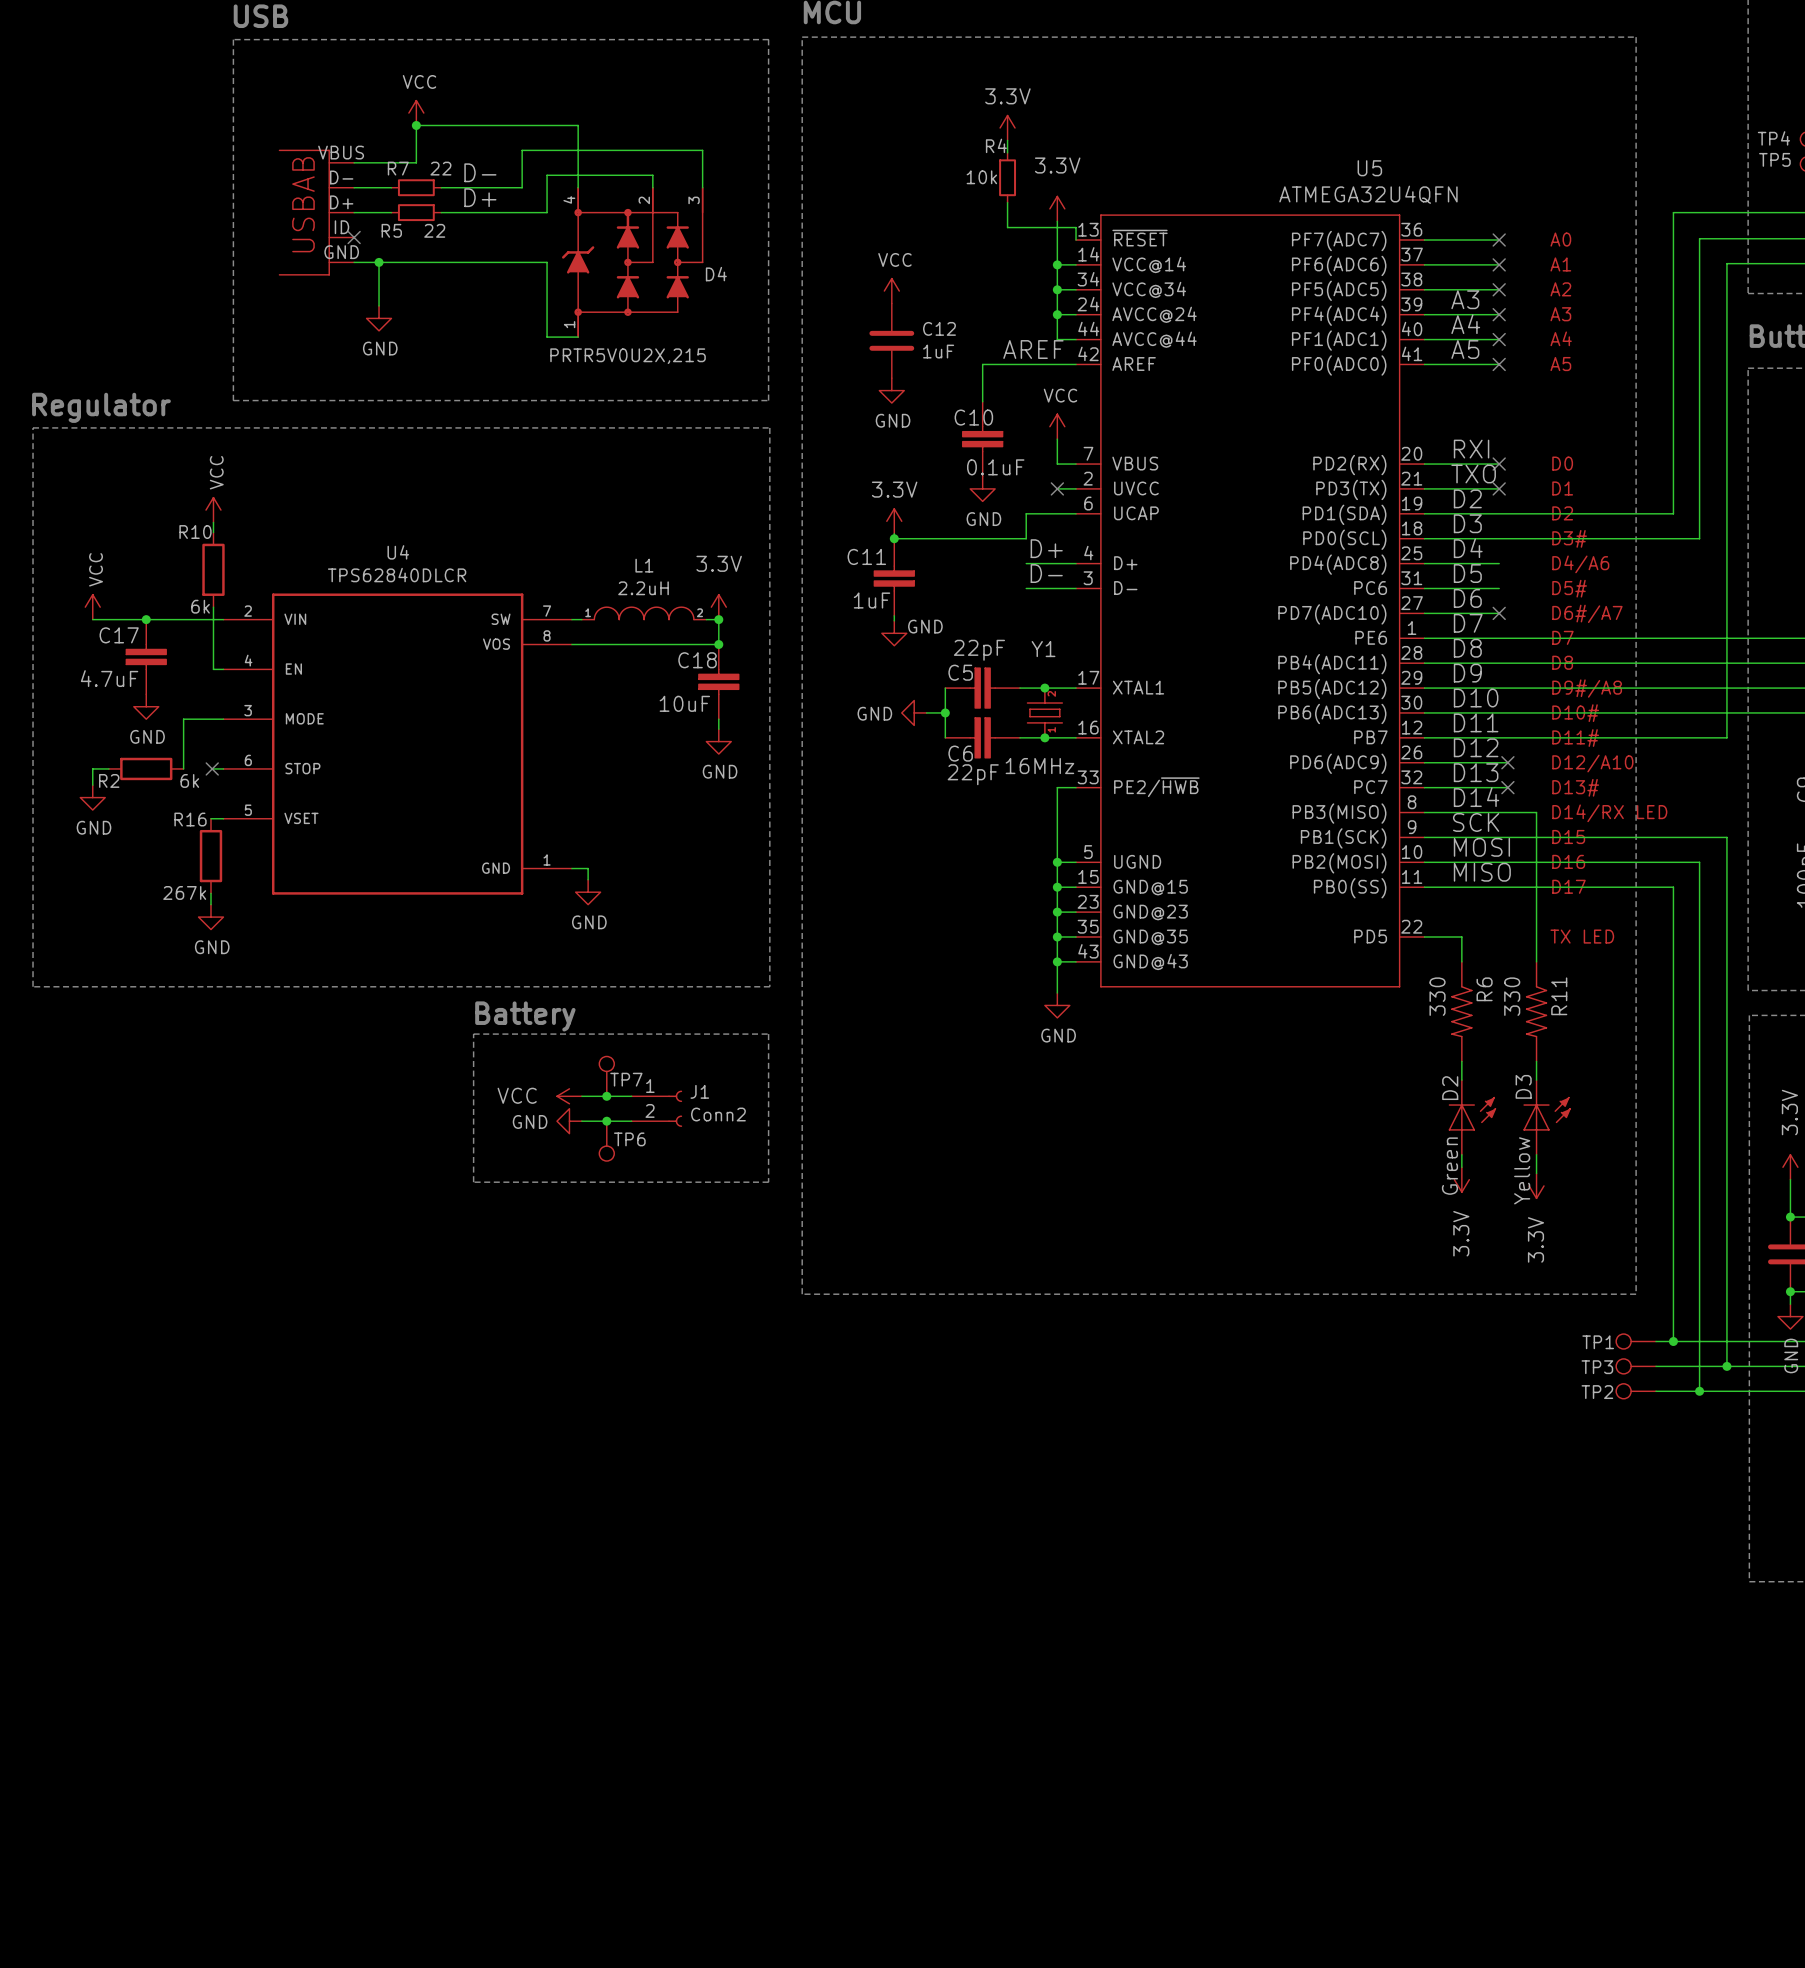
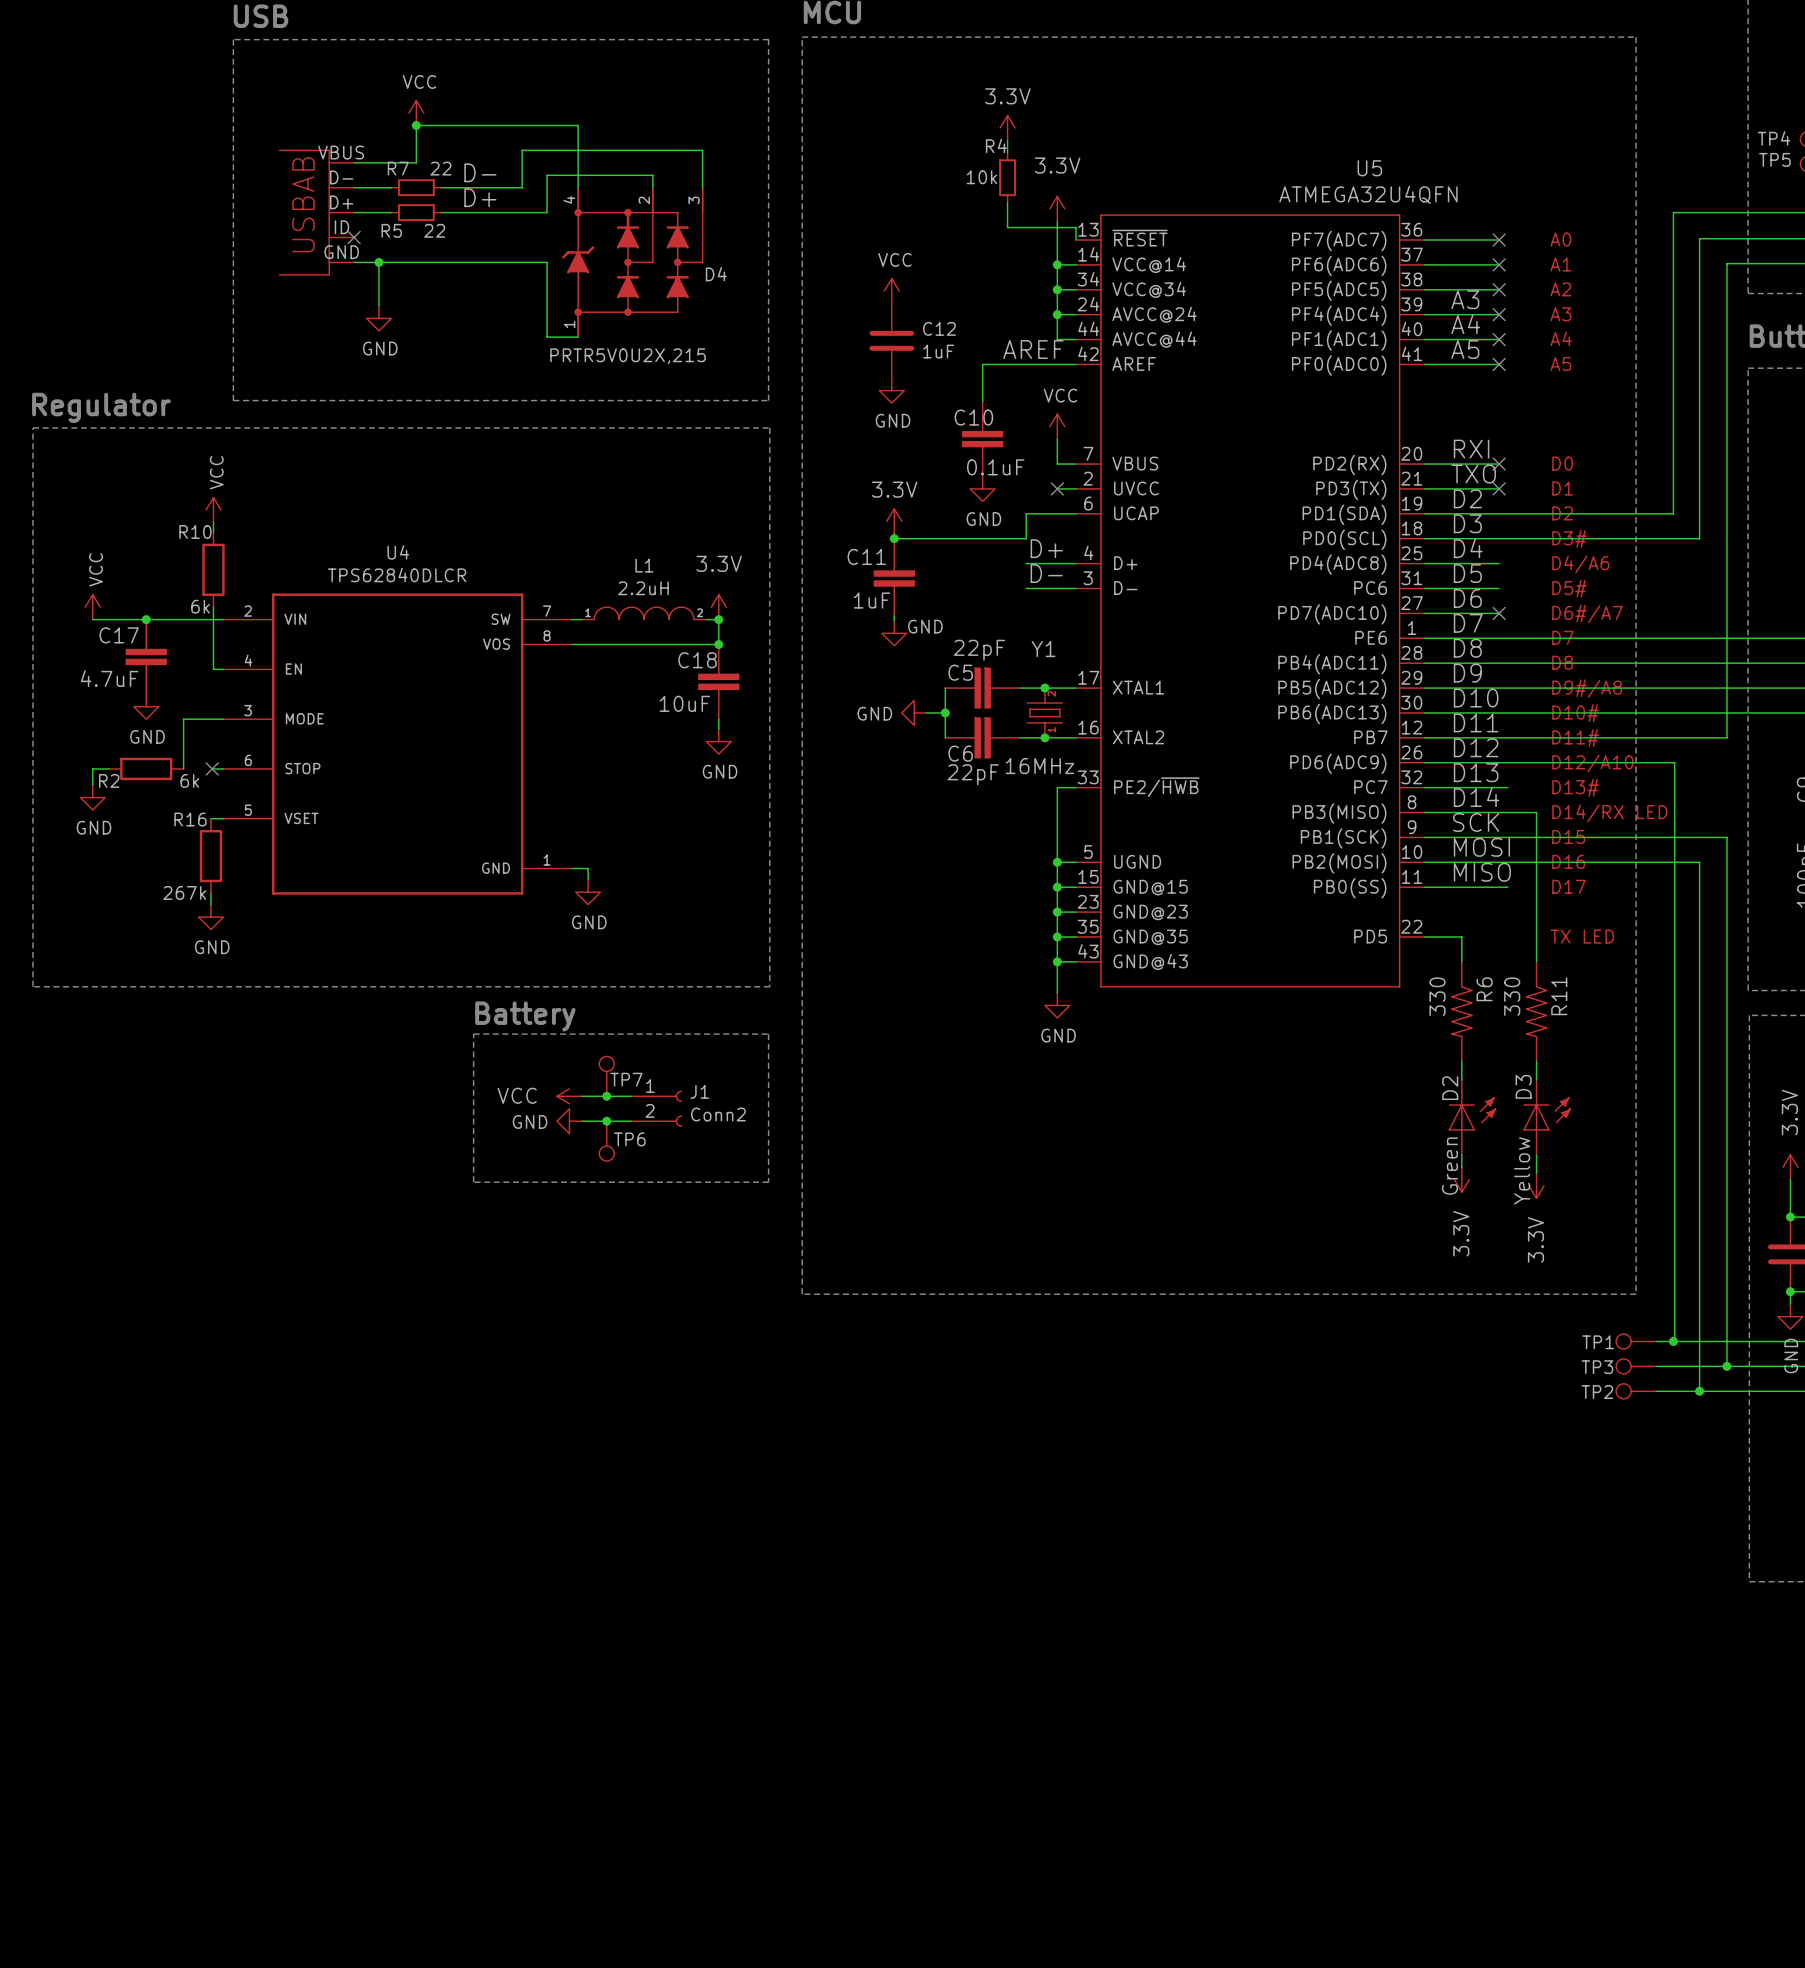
wire: none -> (1507, 762) (1674, 762) (1674, 1341)
no-connect mark: (1507, 762) -> none
no-connect mark: (1507, 787) -> none
wire: (1507, 887) (1673, 887) (1673, 1341) -> none

